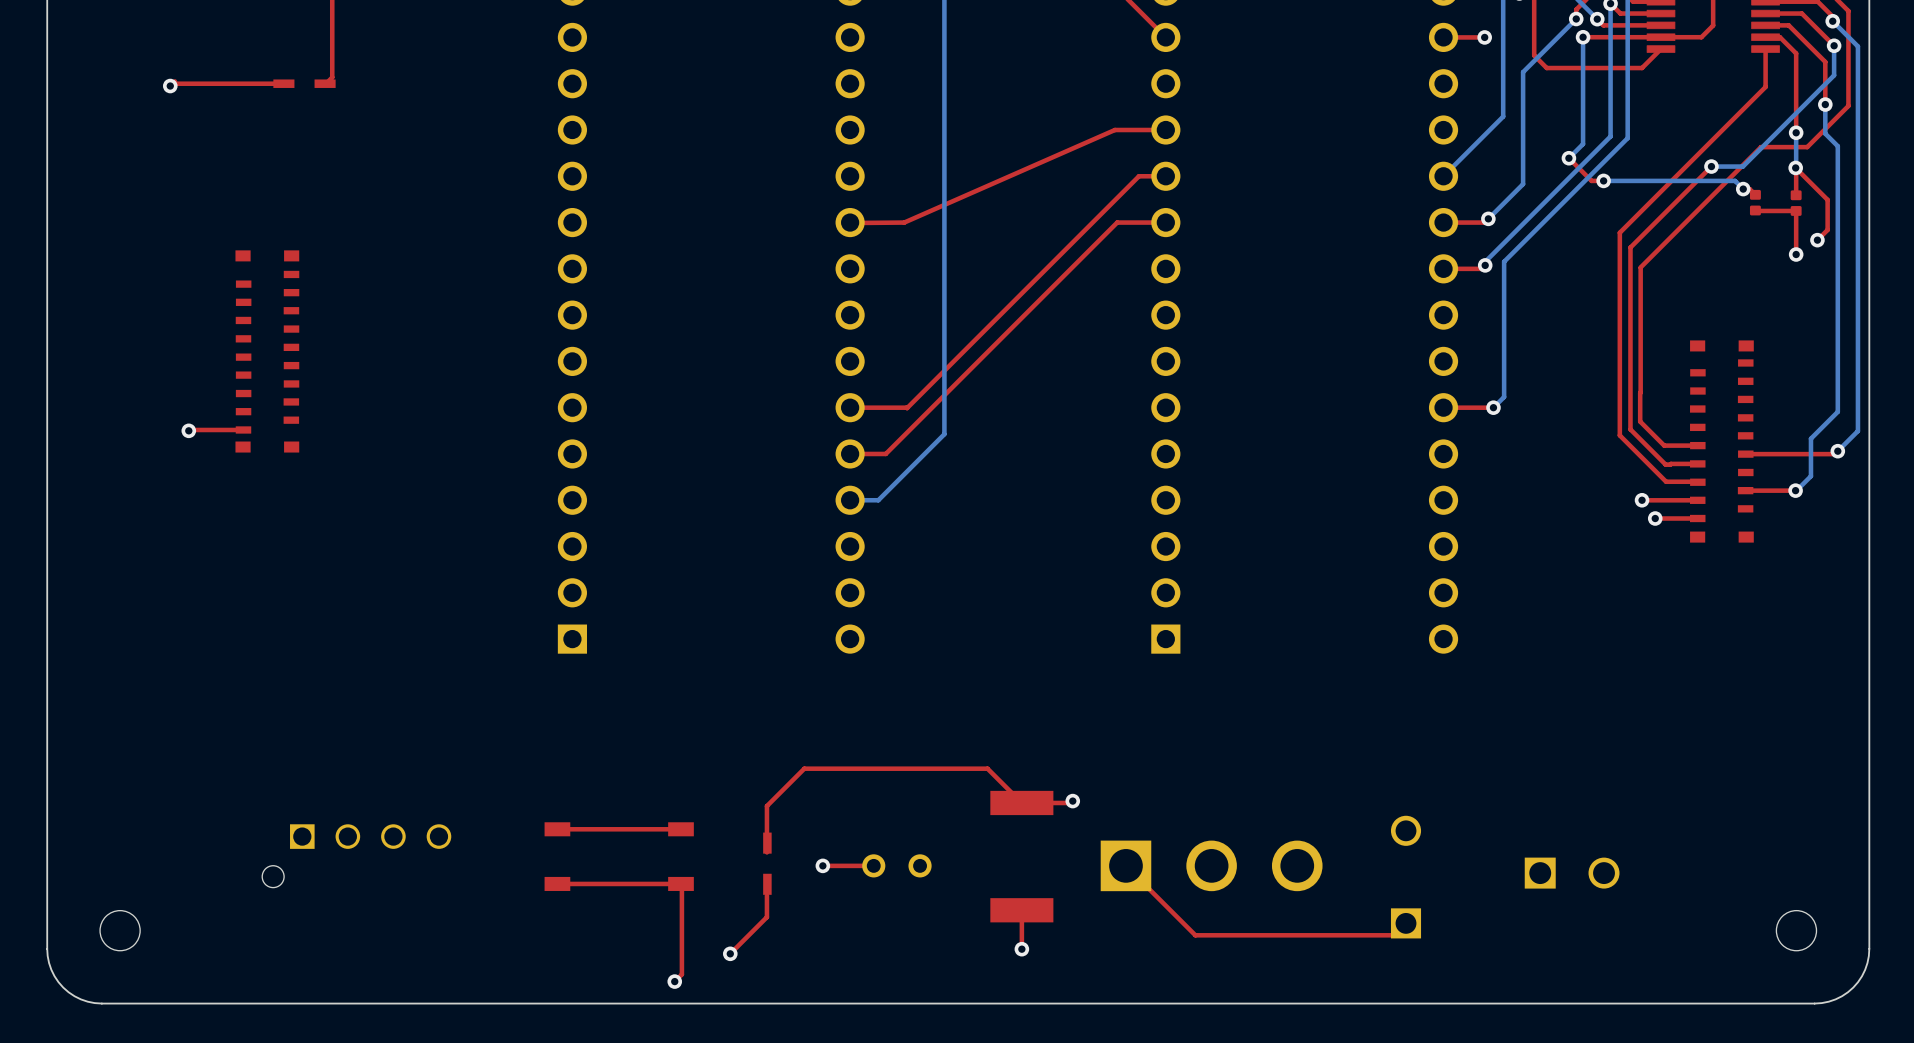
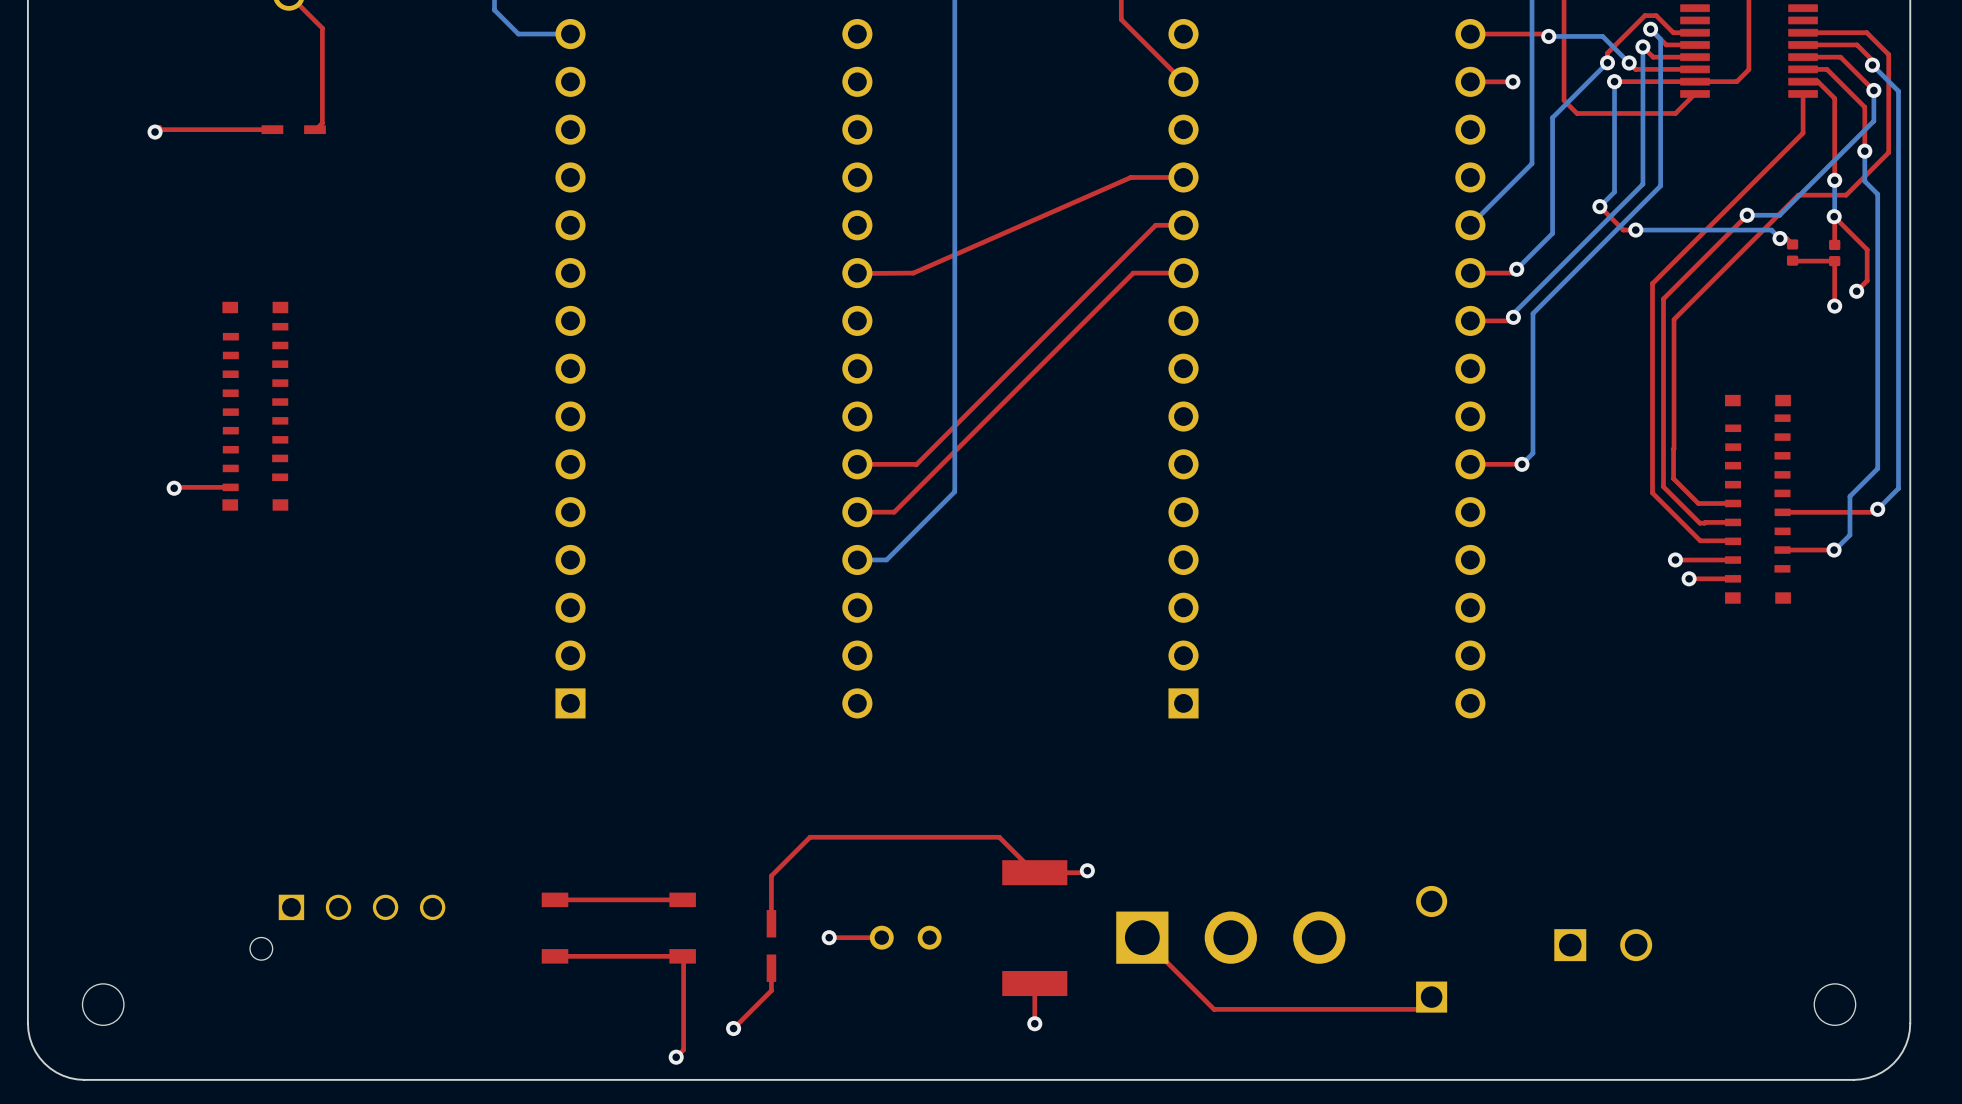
part footprint: [763, 832, 772, 895] -> [766, 910, 777, 982]

